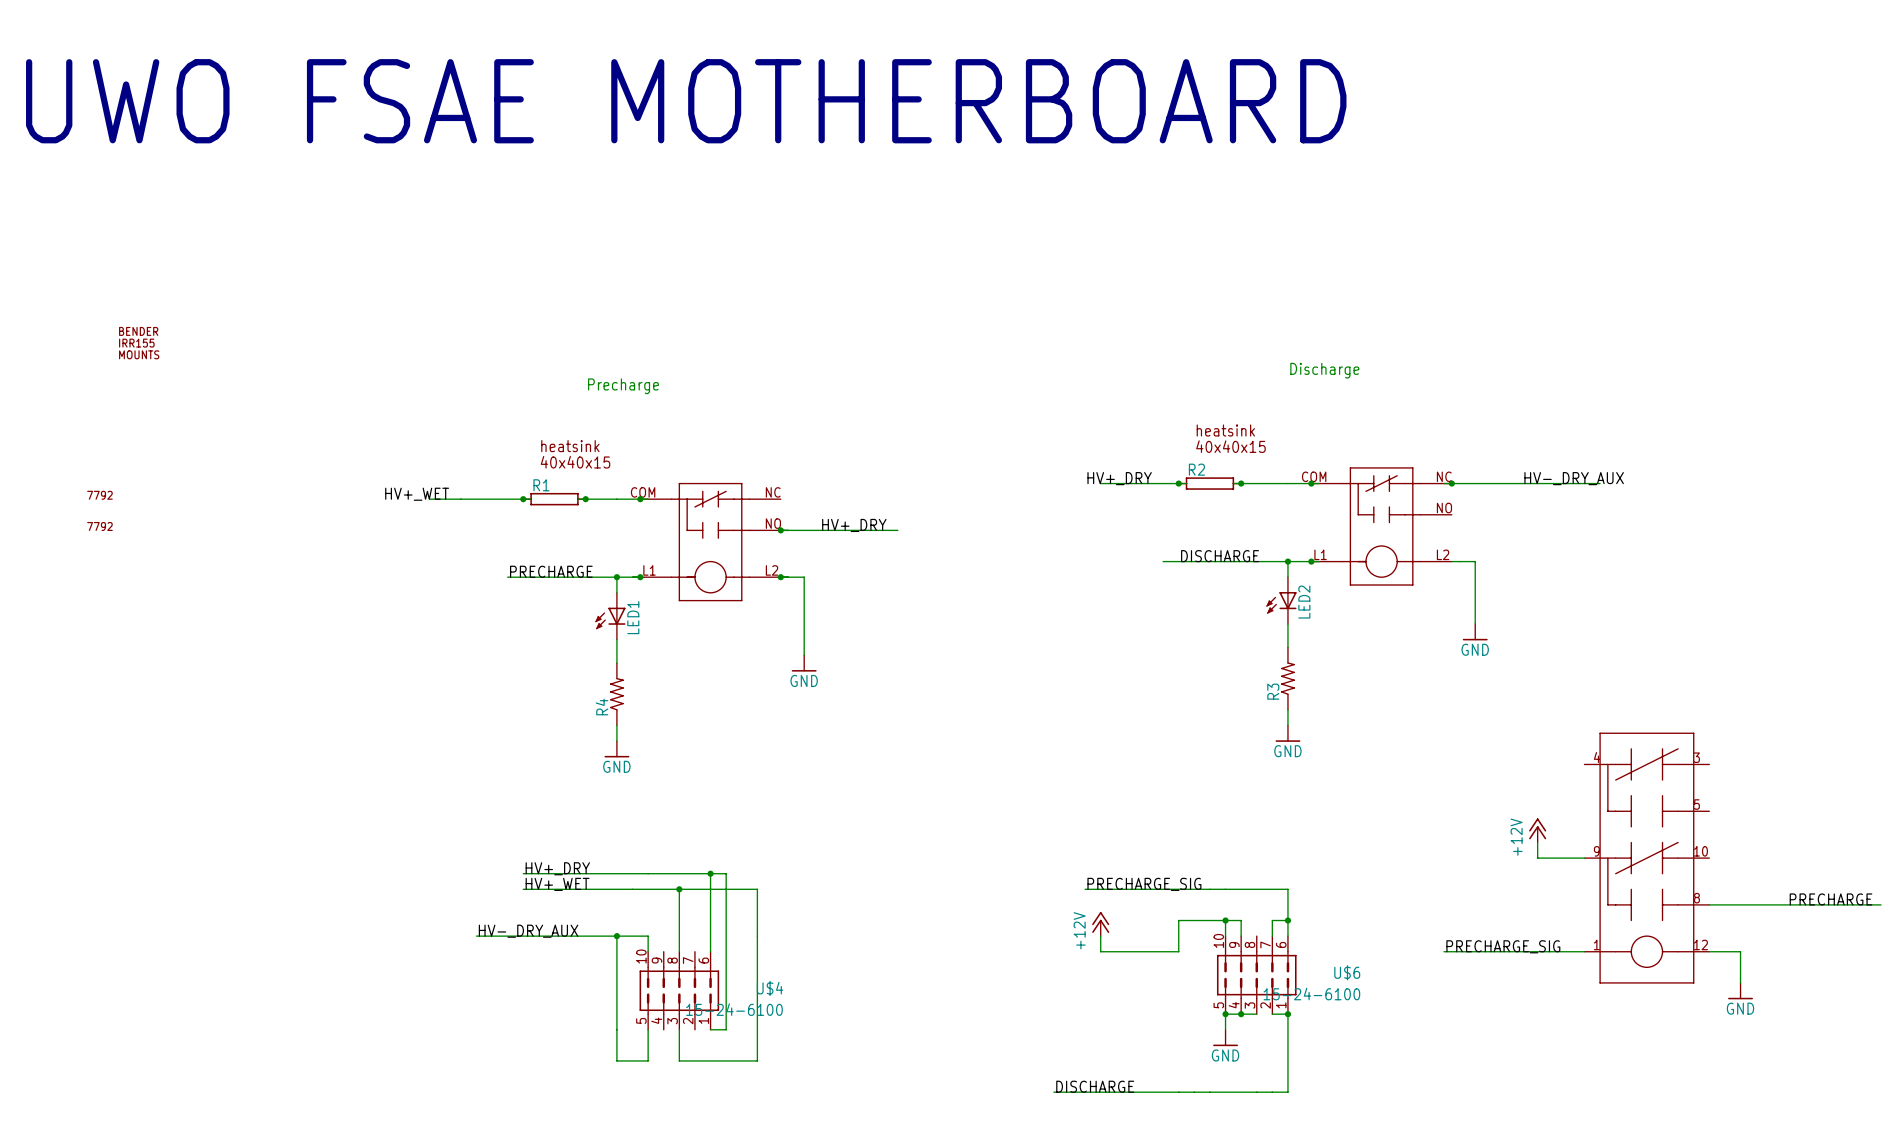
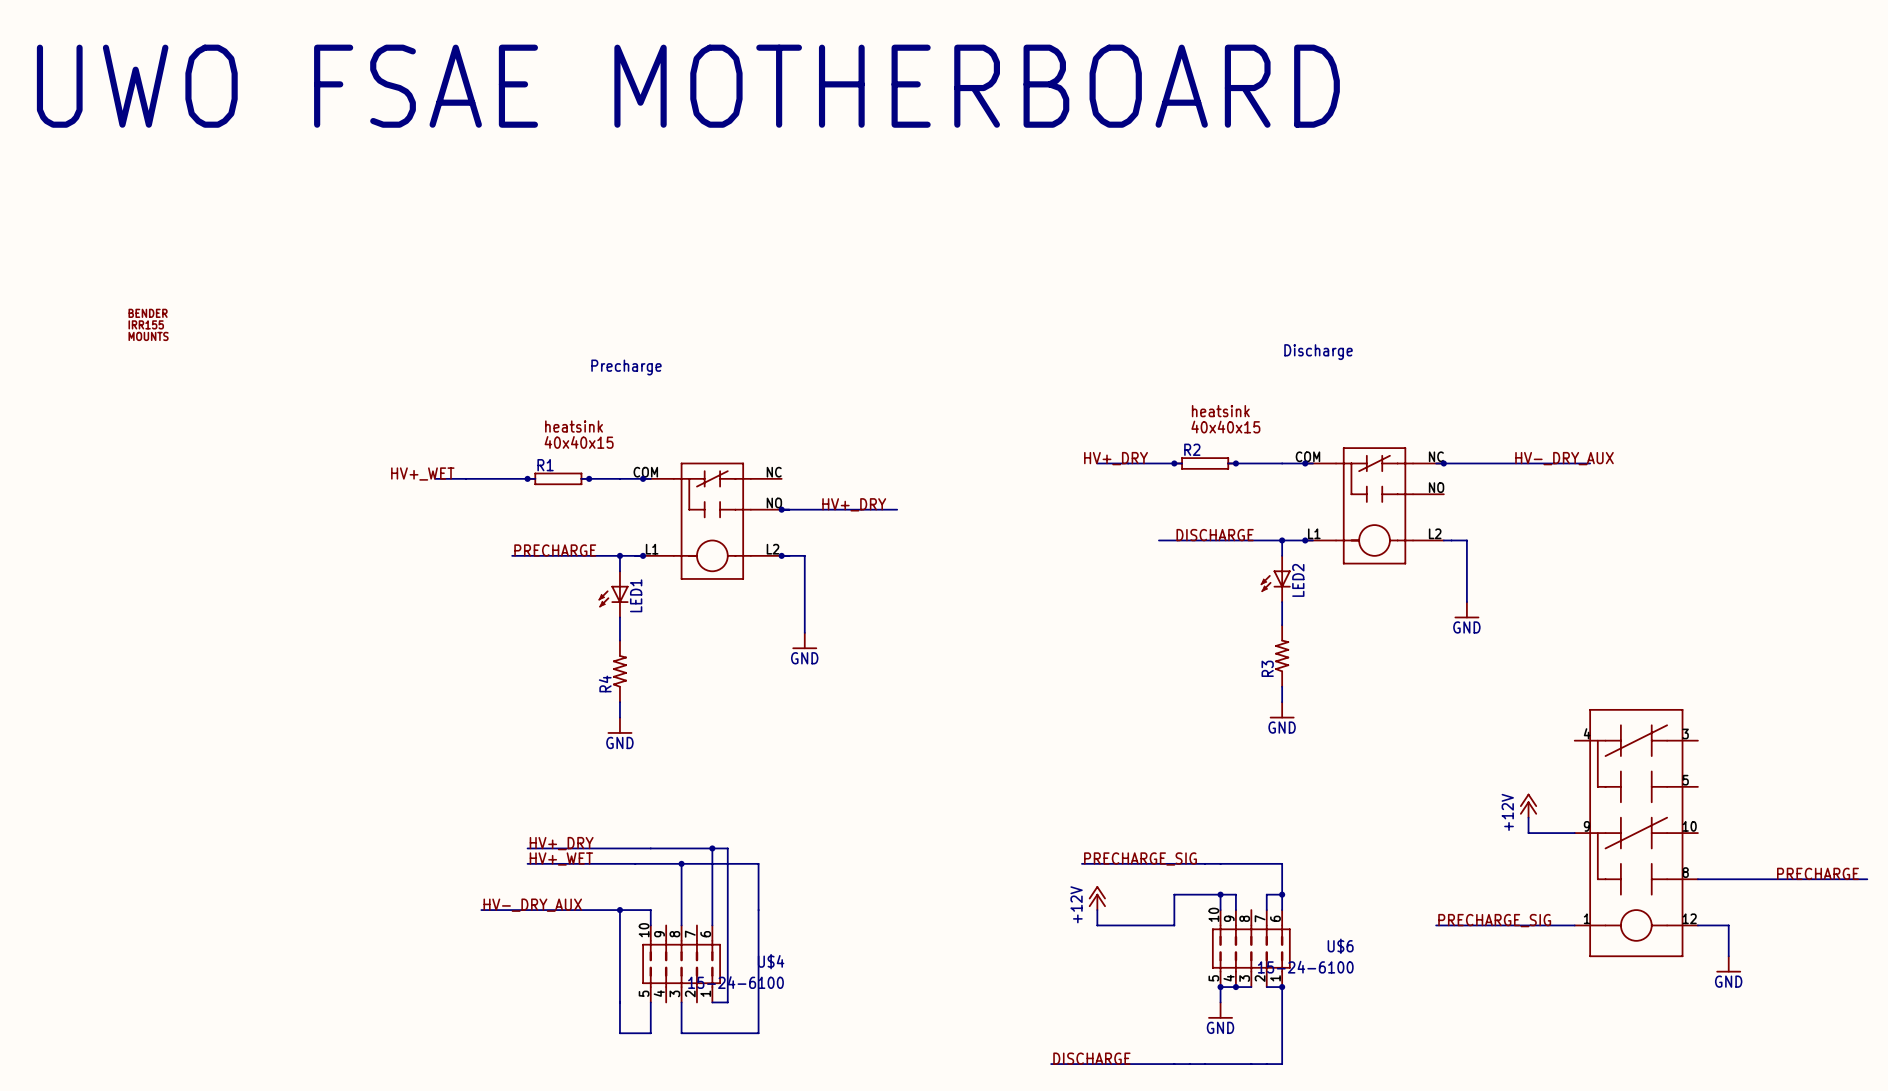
part: (99, 495) -> none
part: (99, 526) -> none

